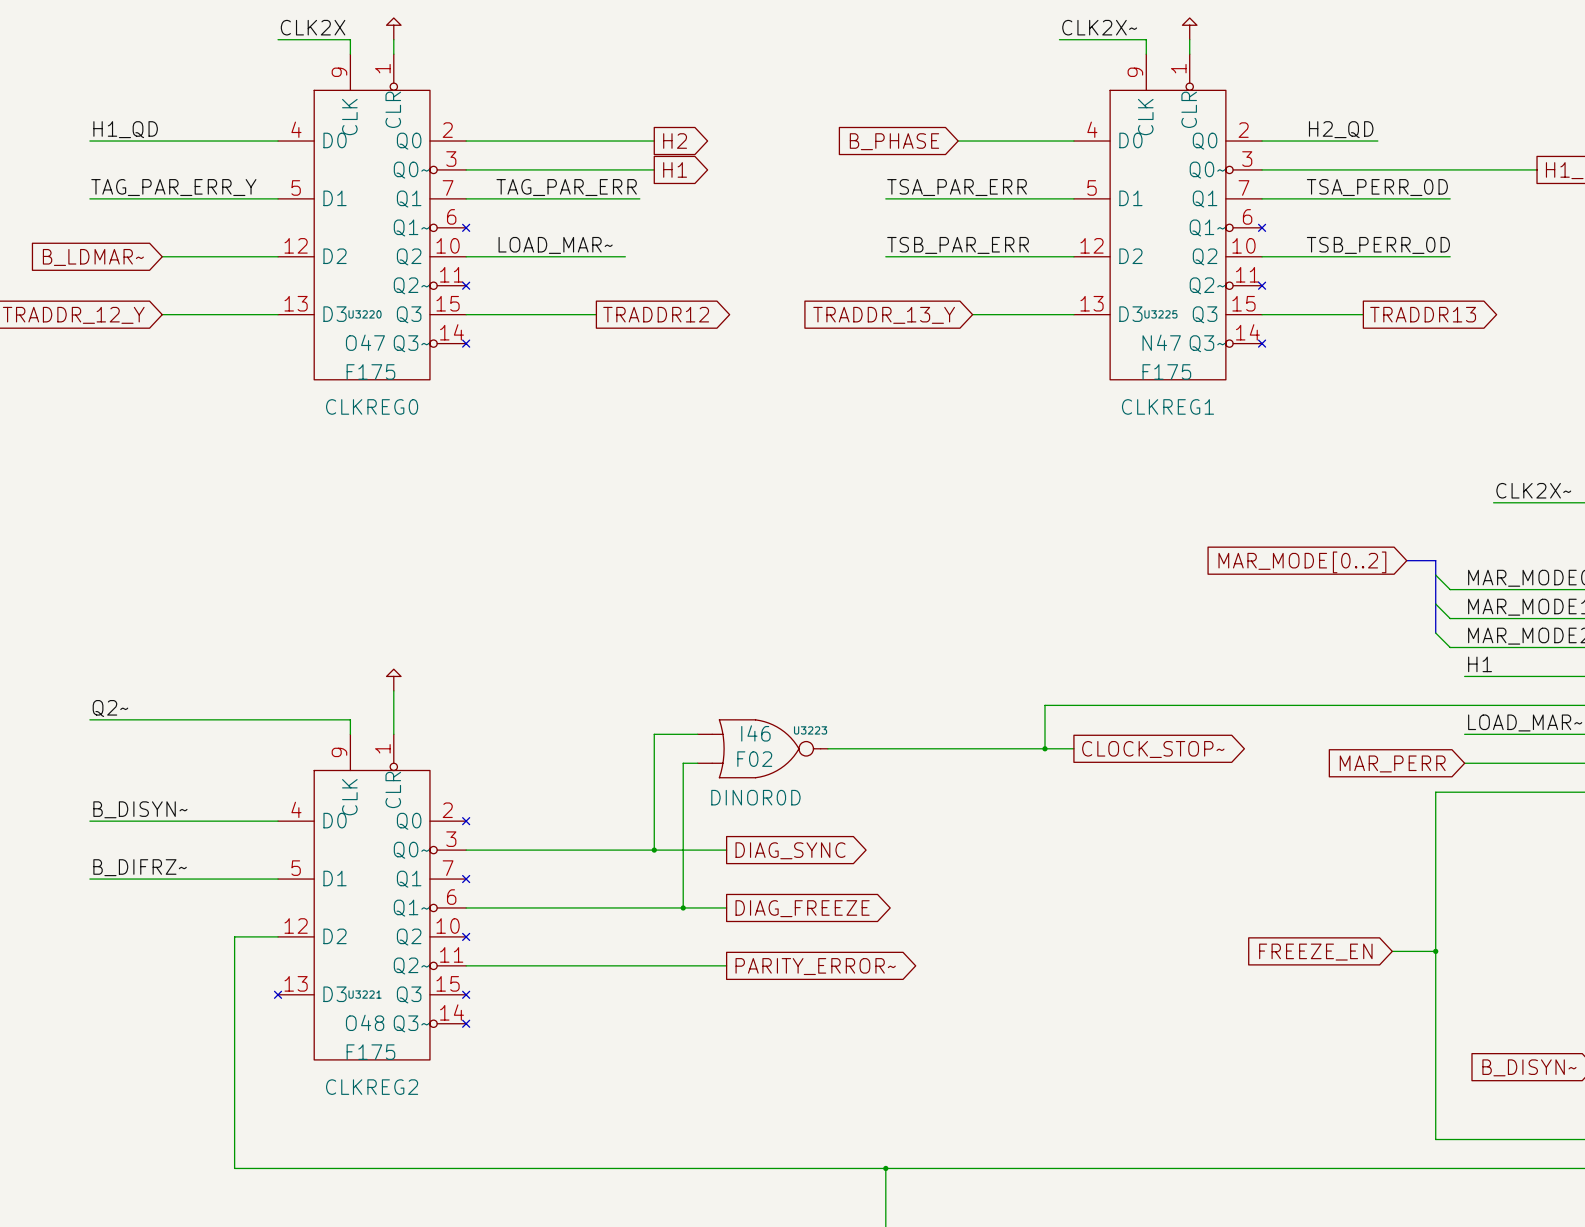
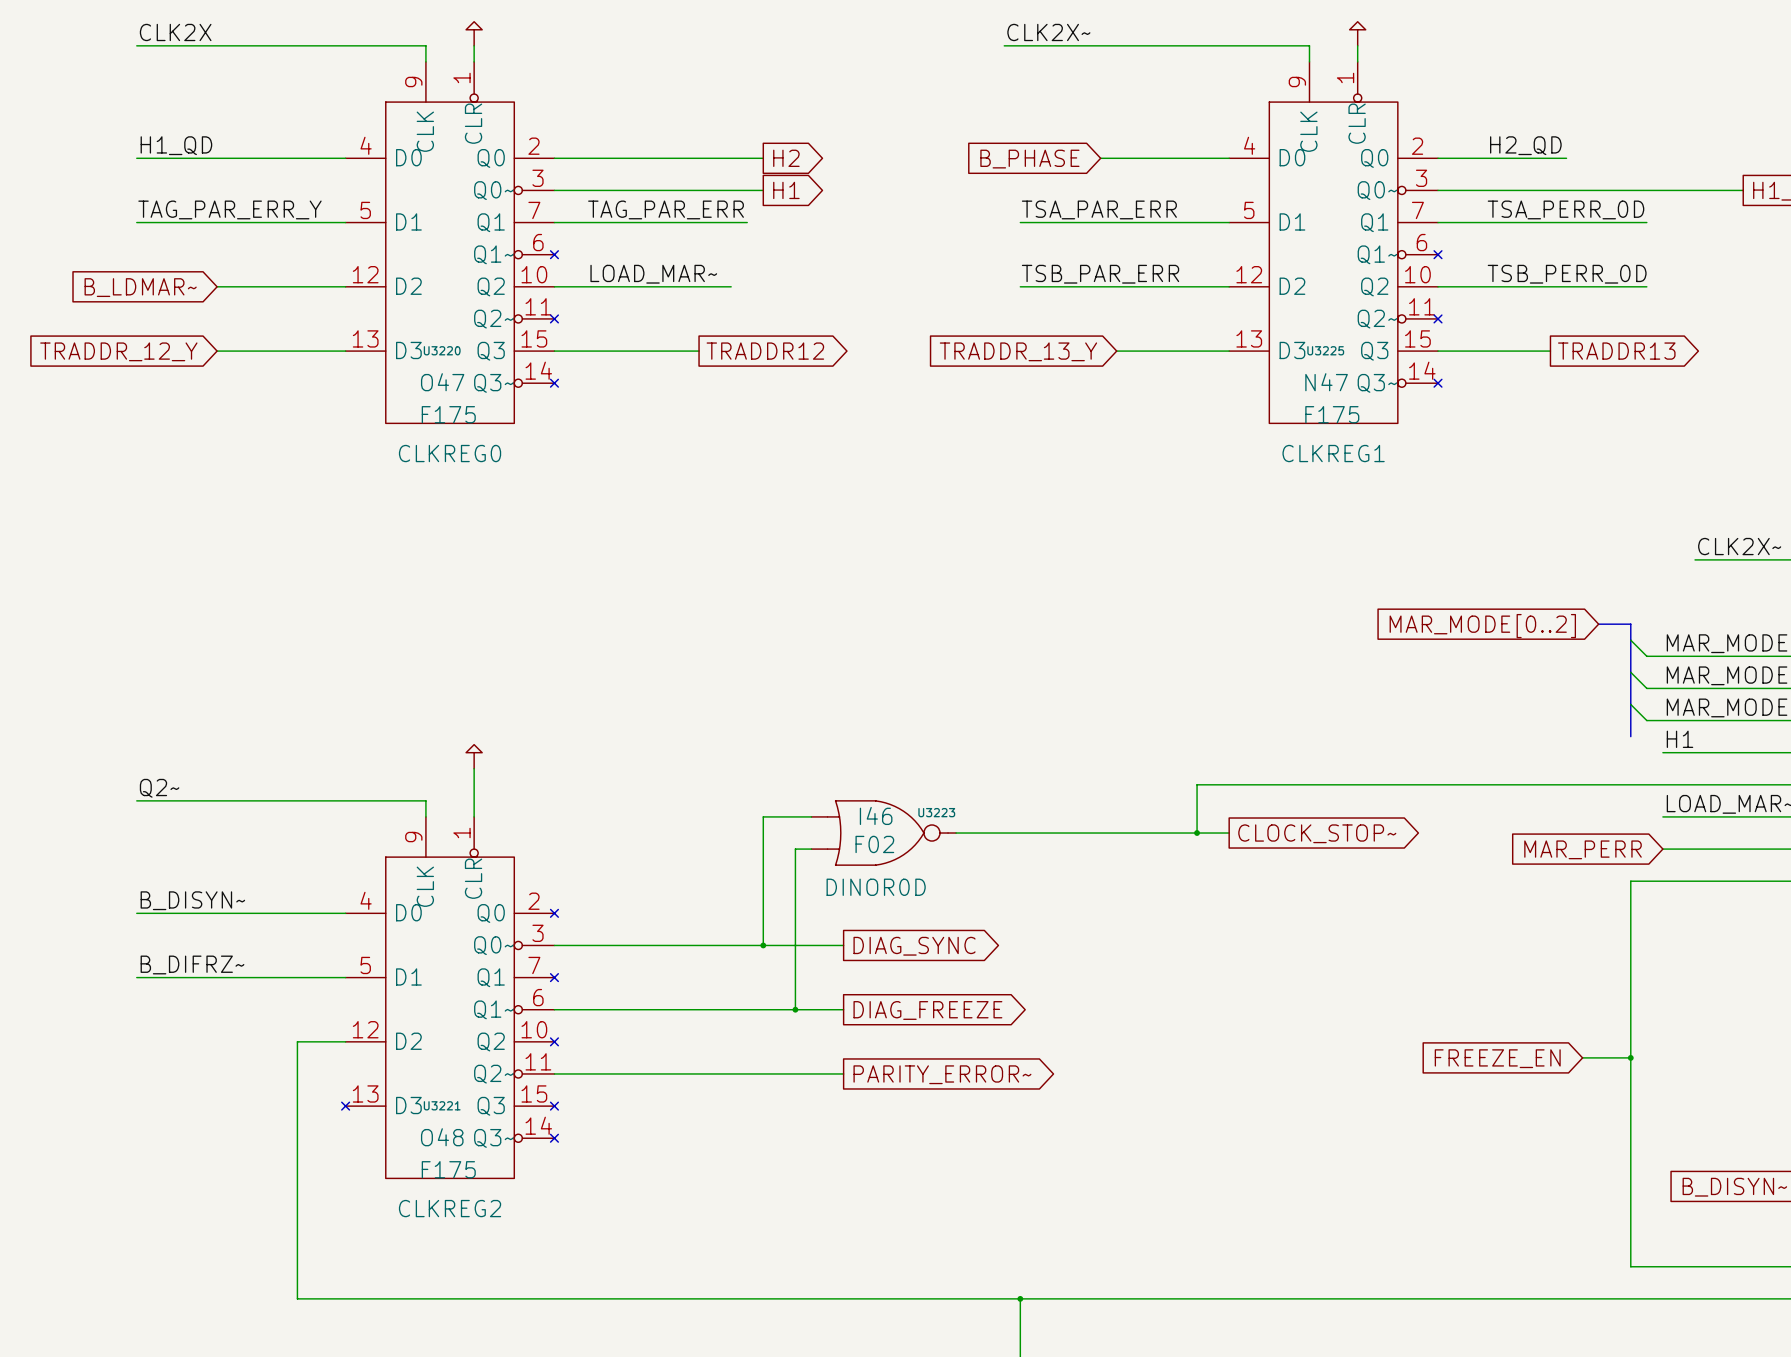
label: none -> CLK2X (175, 32)
label: CLK2X (313, 27) -> none
label: none -> CLK2X~ (1048, 32)
label: CLK2X~ (1099, 27) -> none
wire: none -> (136, 45) (345, 45)
wire: none -> (1004, 45) (1213, 45)
bus: none -> (1630, 704) (1630, 736)

